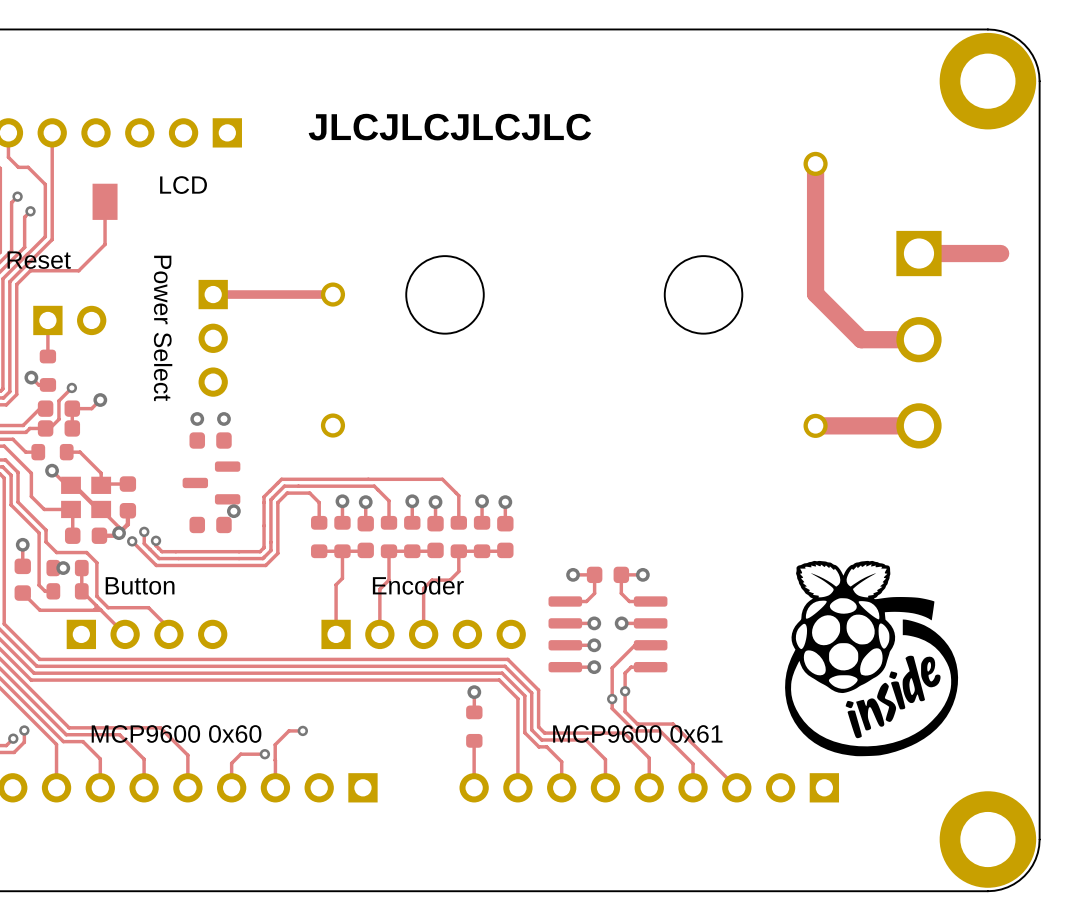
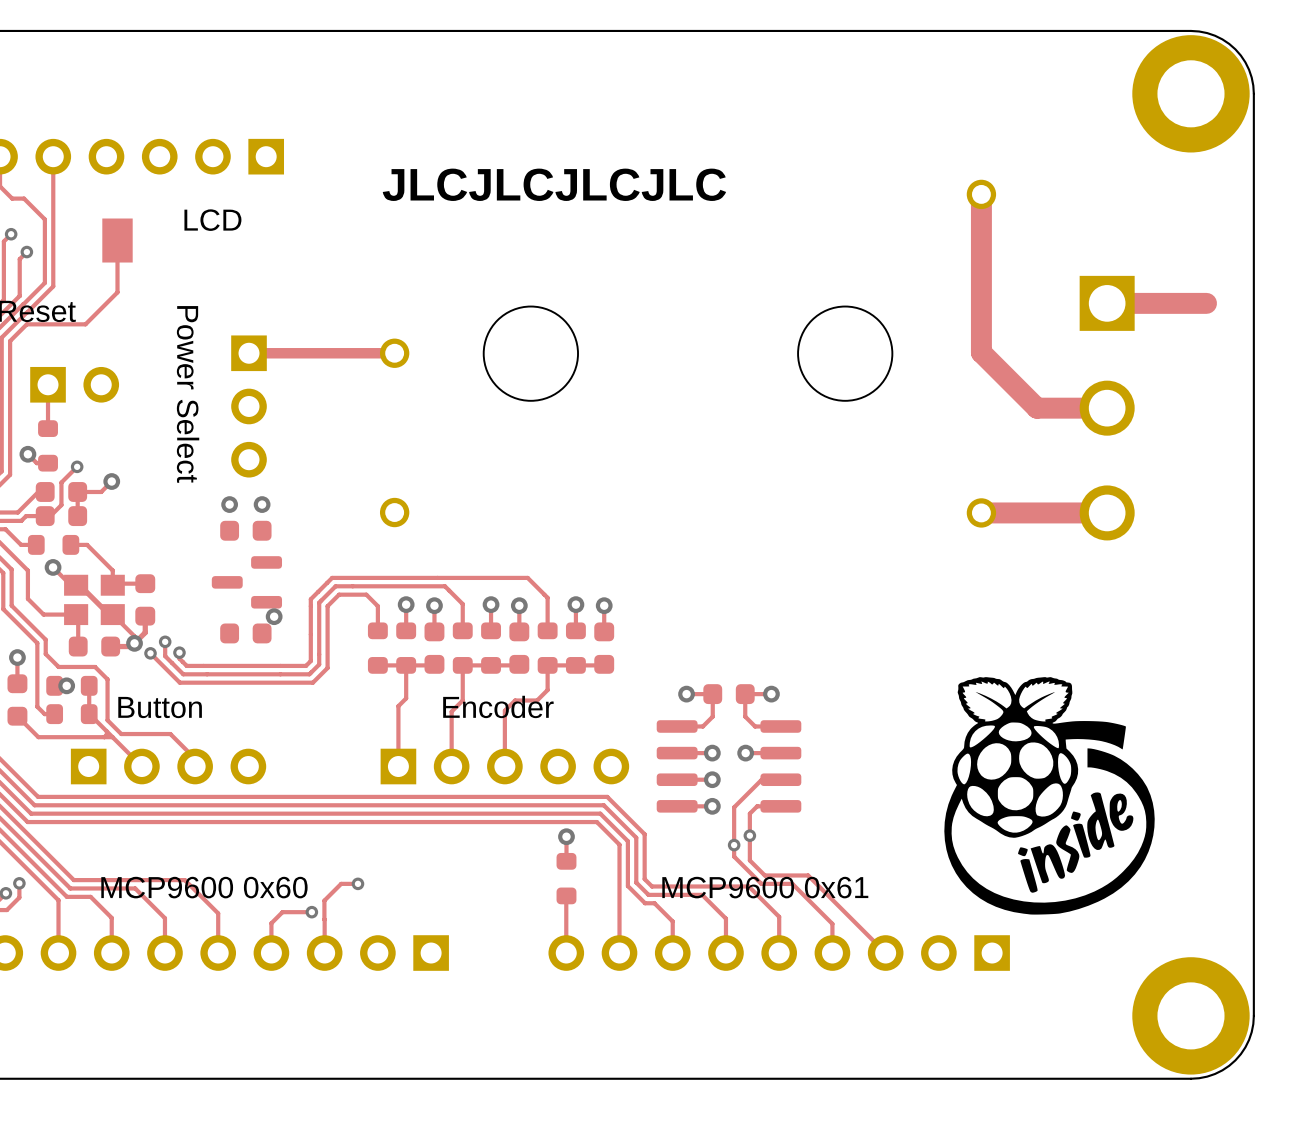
text position: JLCJLCJLCJLC (449, 127) -> JLCJLCJLCJLC (554, 184)

